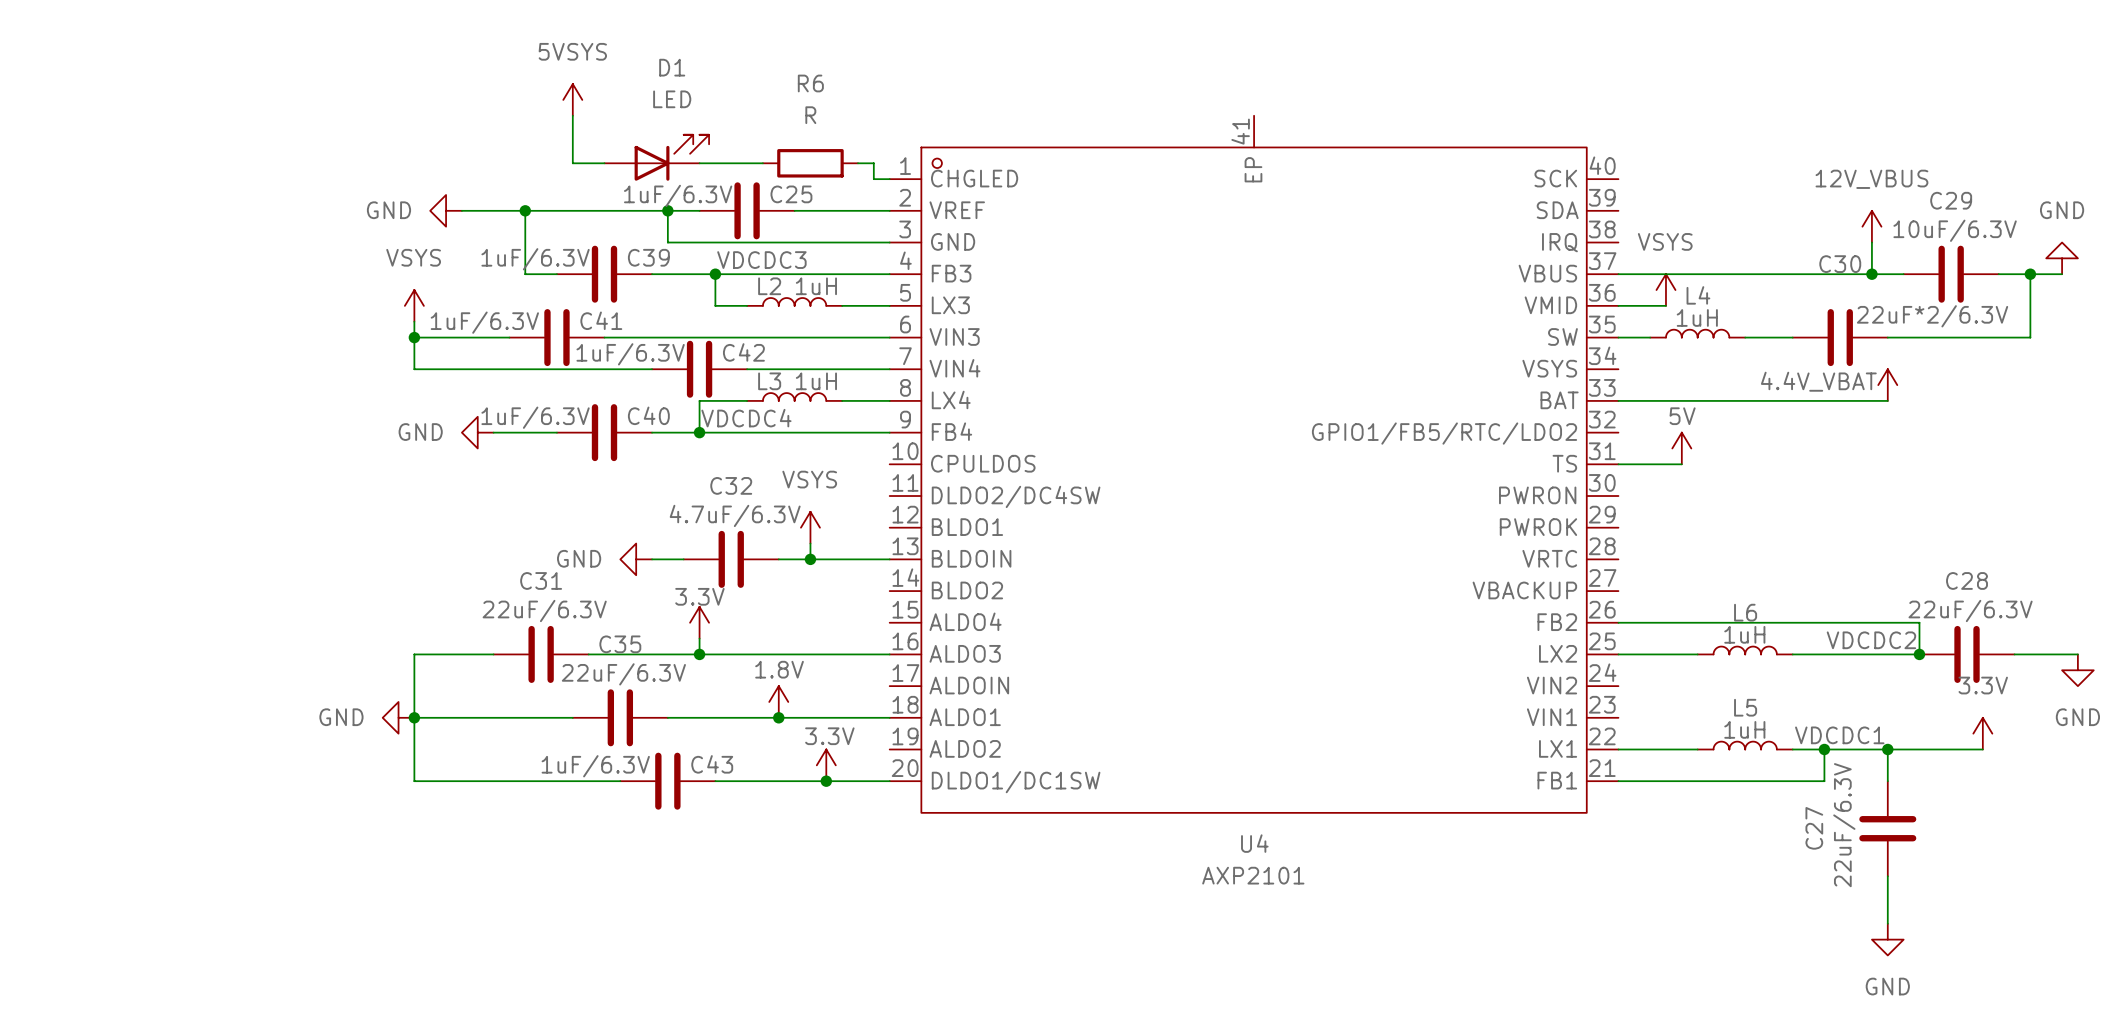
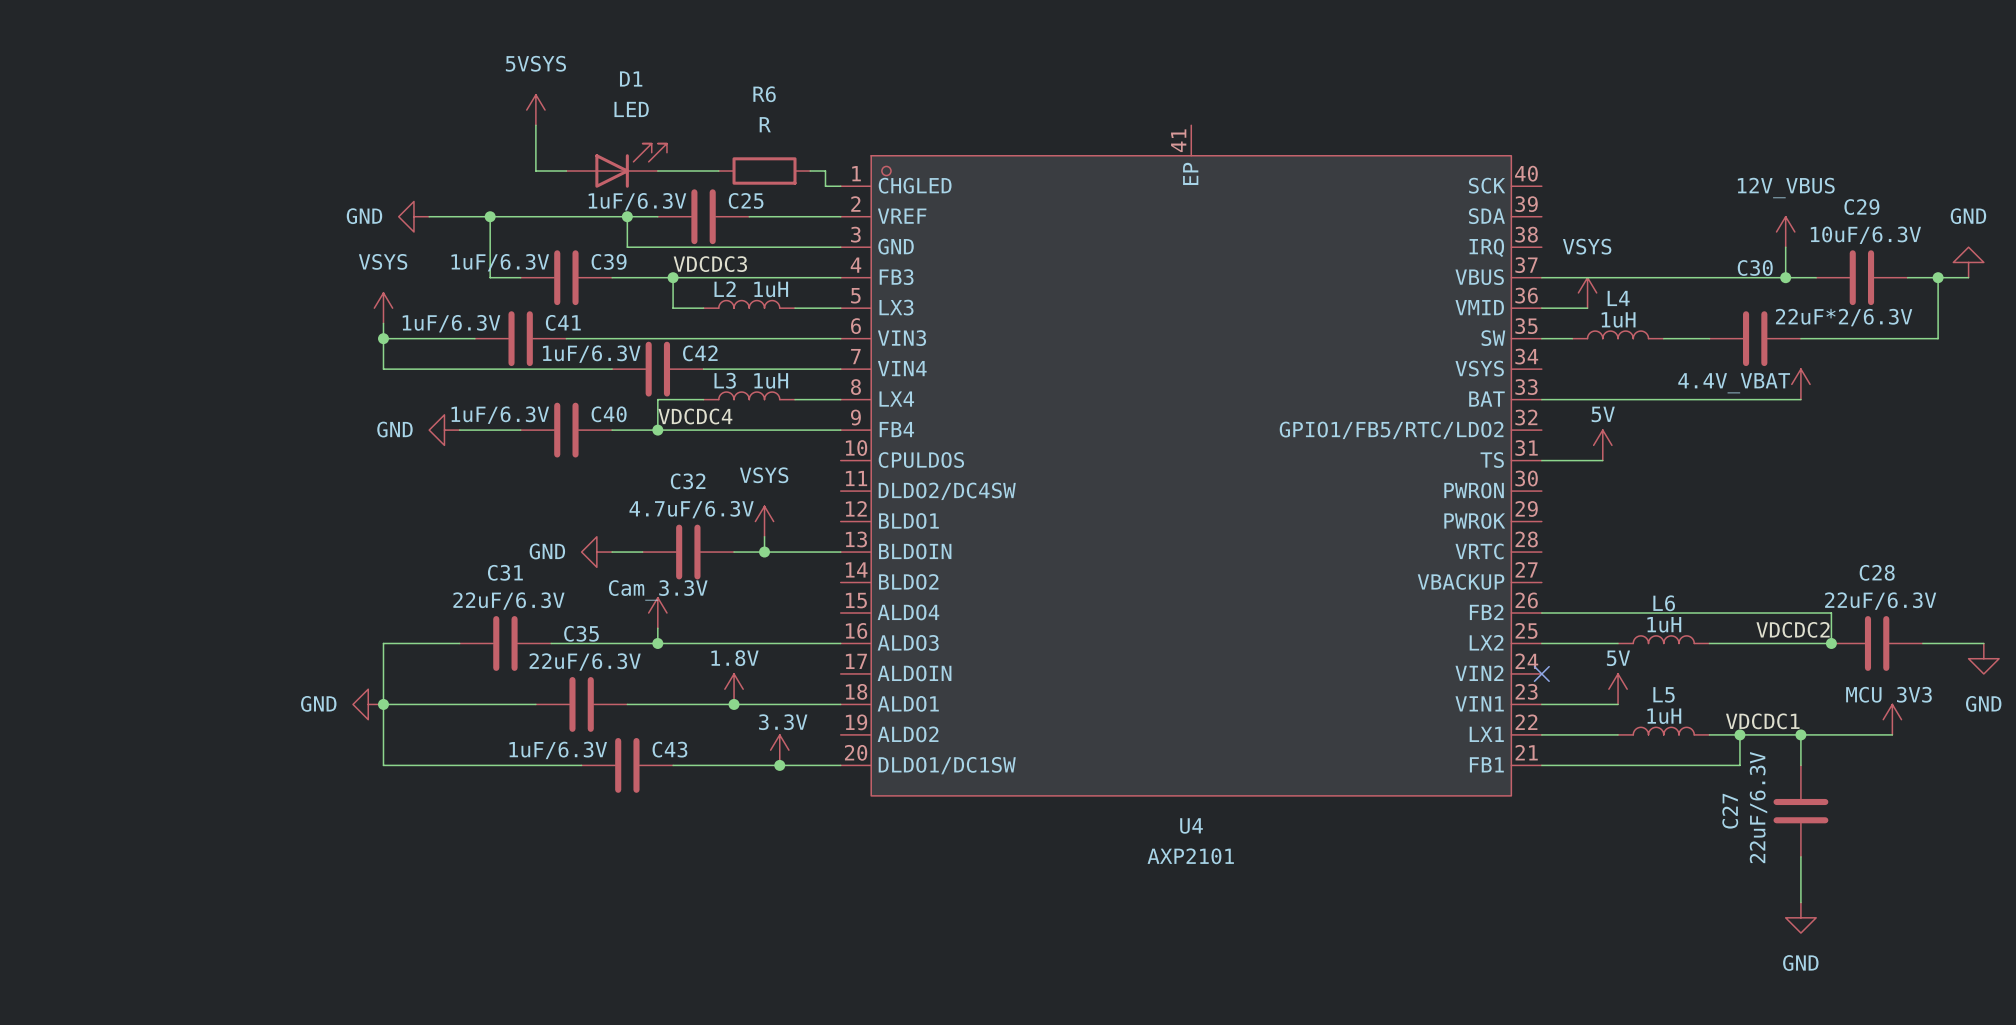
power symbol: 3.3V (699, 622) -> Cam_3.3V (657, 613)
no-connect mark: none -> (1541, 673)
power symbol: none -> 5V (1618, 689)
wire: none -> (1541, 704) (1618, 704)
power symbol: 3.3V (1982, 733) -> MCU 3V3 (1892, 719)

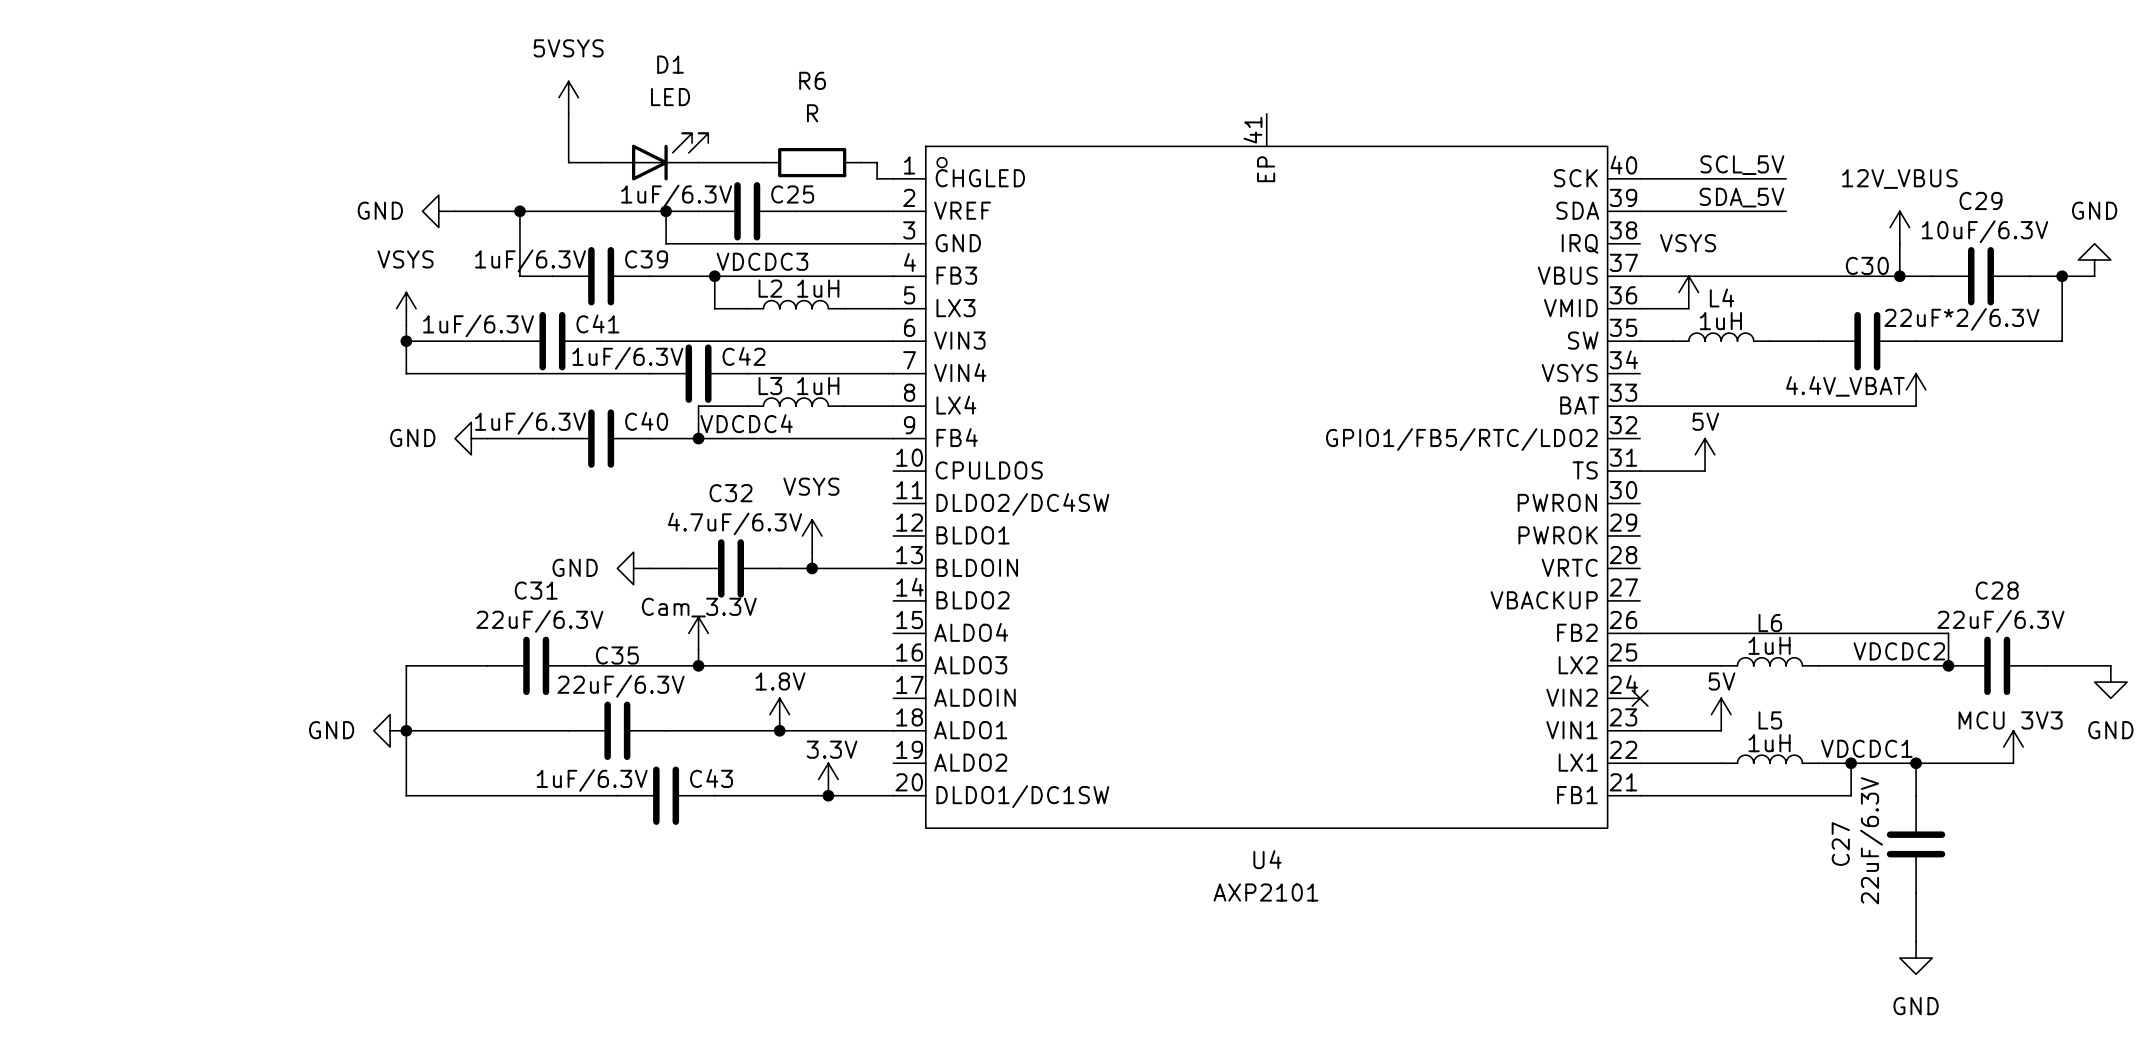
label: none -> SCL_5V (1742, 165)
wire: none -> (1640, 178) (1786, 178)
label: none -> SDA_5V (1742, 197)
wire: none -> (1640, 211) (1786, 211)

